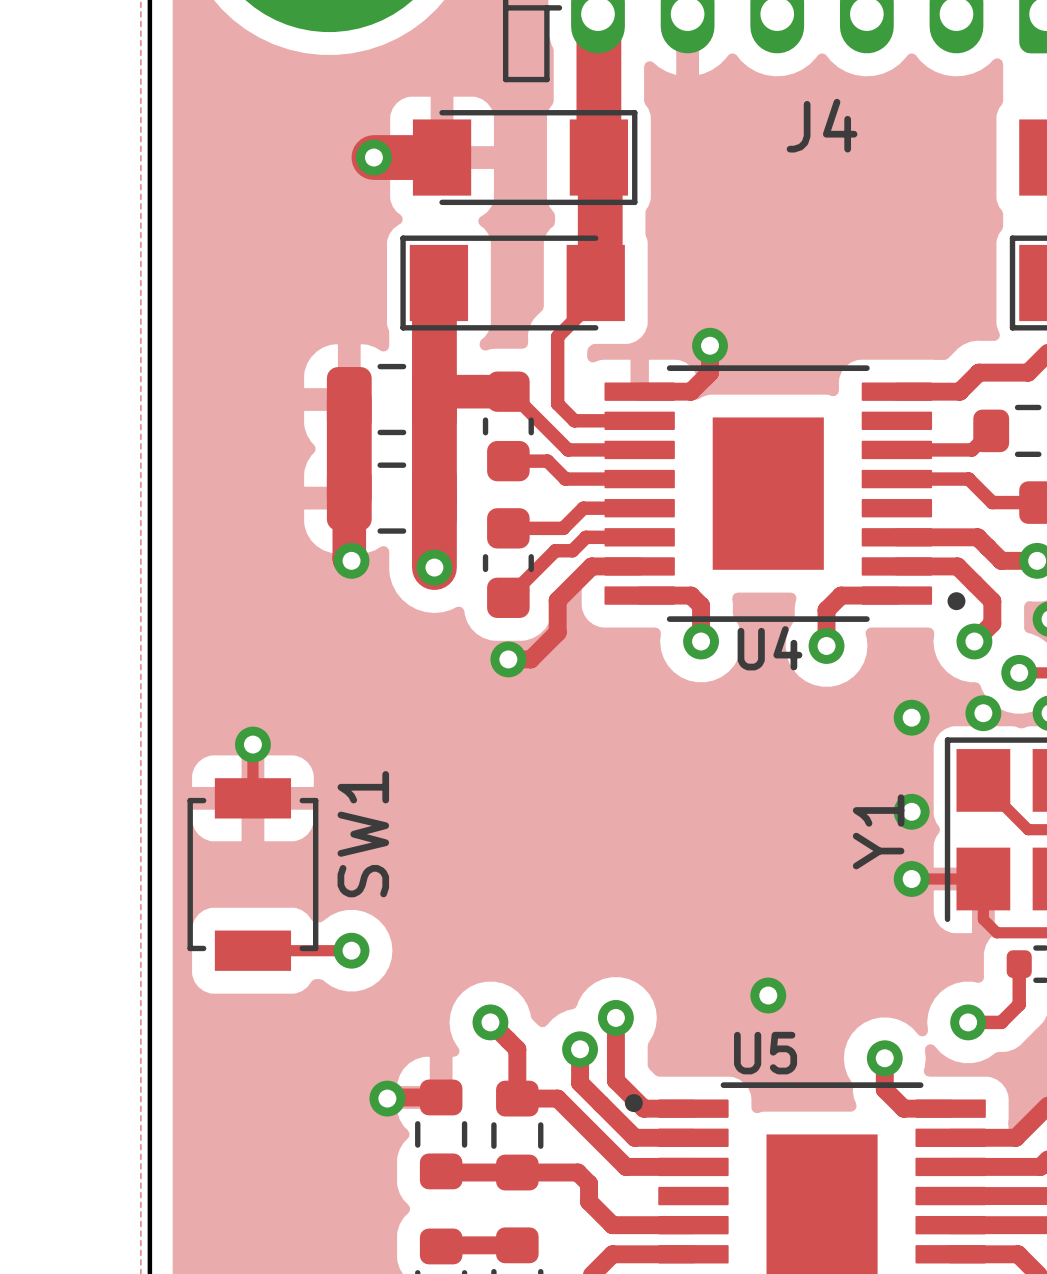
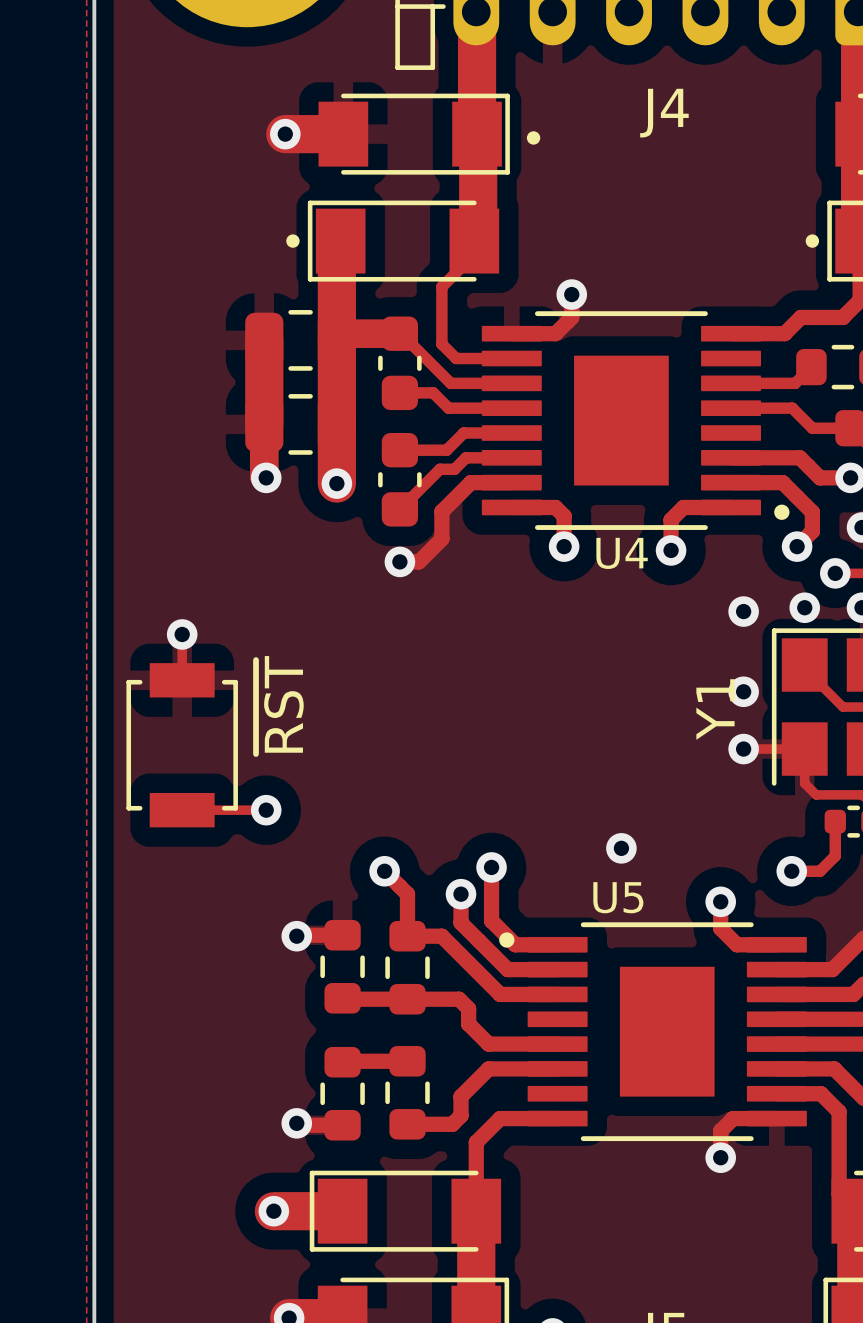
drawing: none -> [526, 131, 541, 145]
drawing: none -> [286, 234, 300, 248]
drawing: none -> [805, 234, 820, 248]
text: none -> ~{RST} (279, 705)
SW1 name: SW1 (363, 834) -> none

